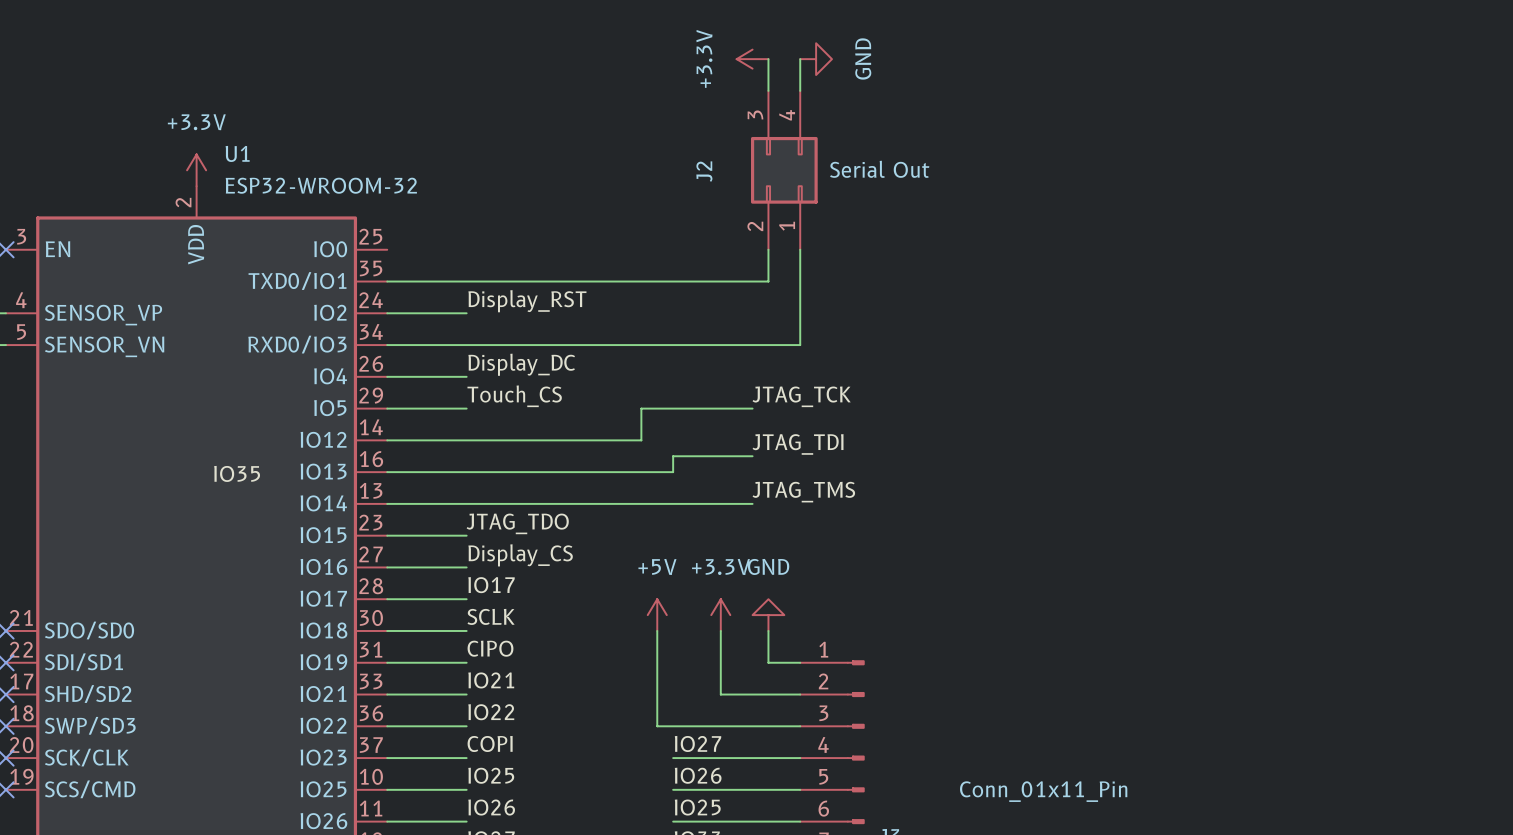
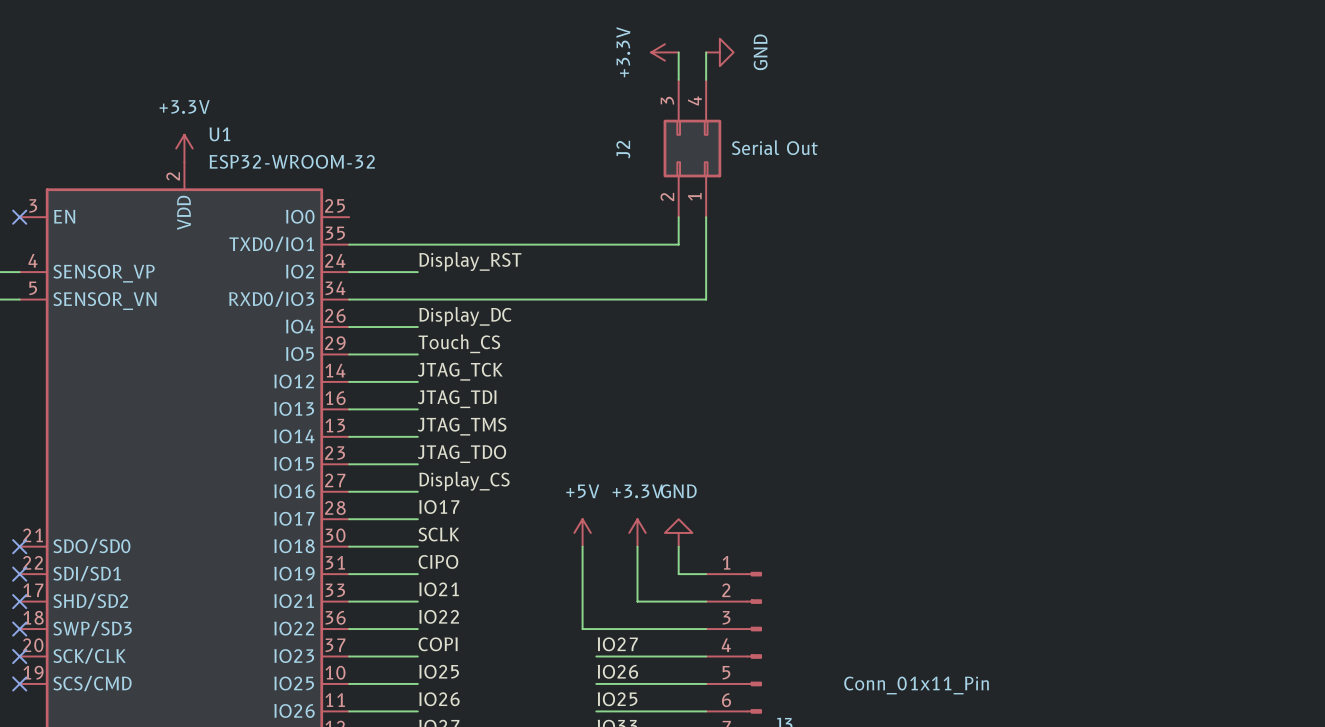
label position: JTAG_TCK (801, 396) -> JTAG_TCK (460, 371)
wire: (752, 408) (641, 408) (641, 440) (466, 440) -> none
label position: JTAG_TDI (798, 444) -> JTAG_TDI (457, 399)
wire: (752, 456) (673, 456) (673, 472) (466, 472) -> none
label: IO35 (237, 473) -> none
label position: JTAG_TMS (803, 492) -> JTAG_TMS (462, 426)
wire: (466, 503) (752, 503) -> none

